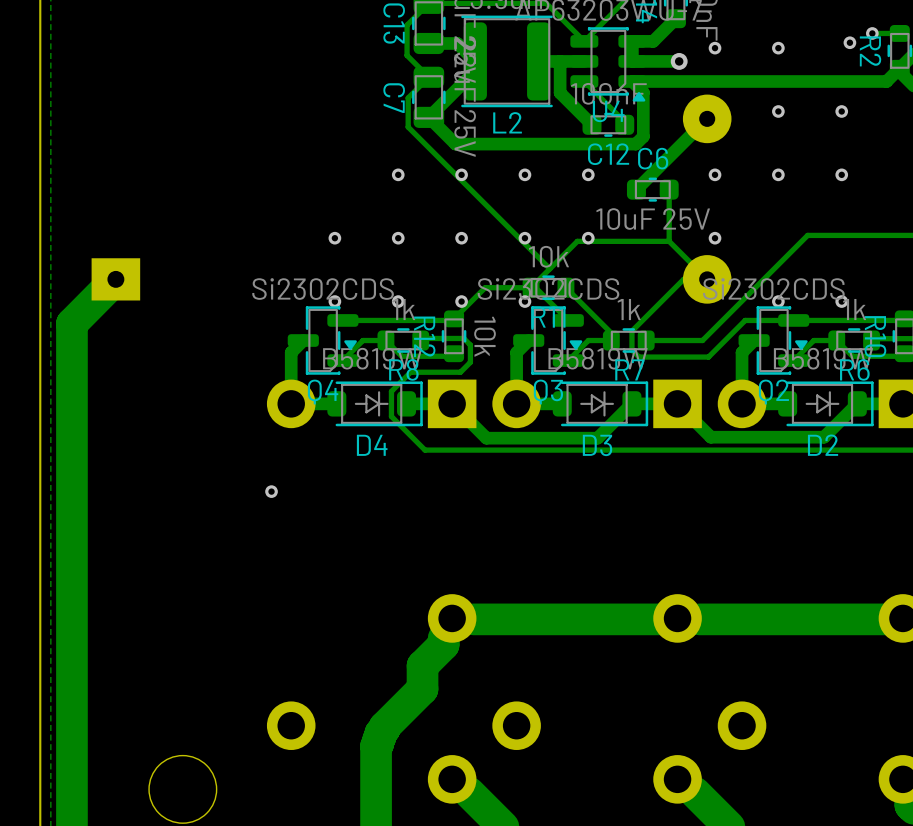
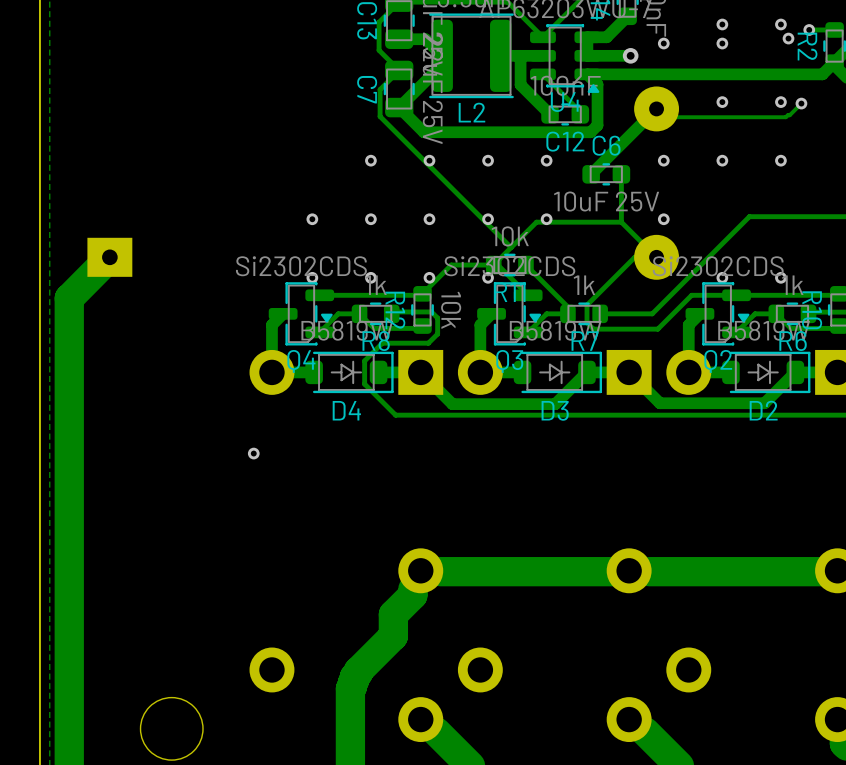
via: none -> (722, 24)
via: none -> (780, 24)
track: none -> (801, 103) (785, 117) (672, 117) (656, 109)
via: none -> (801, 103)

